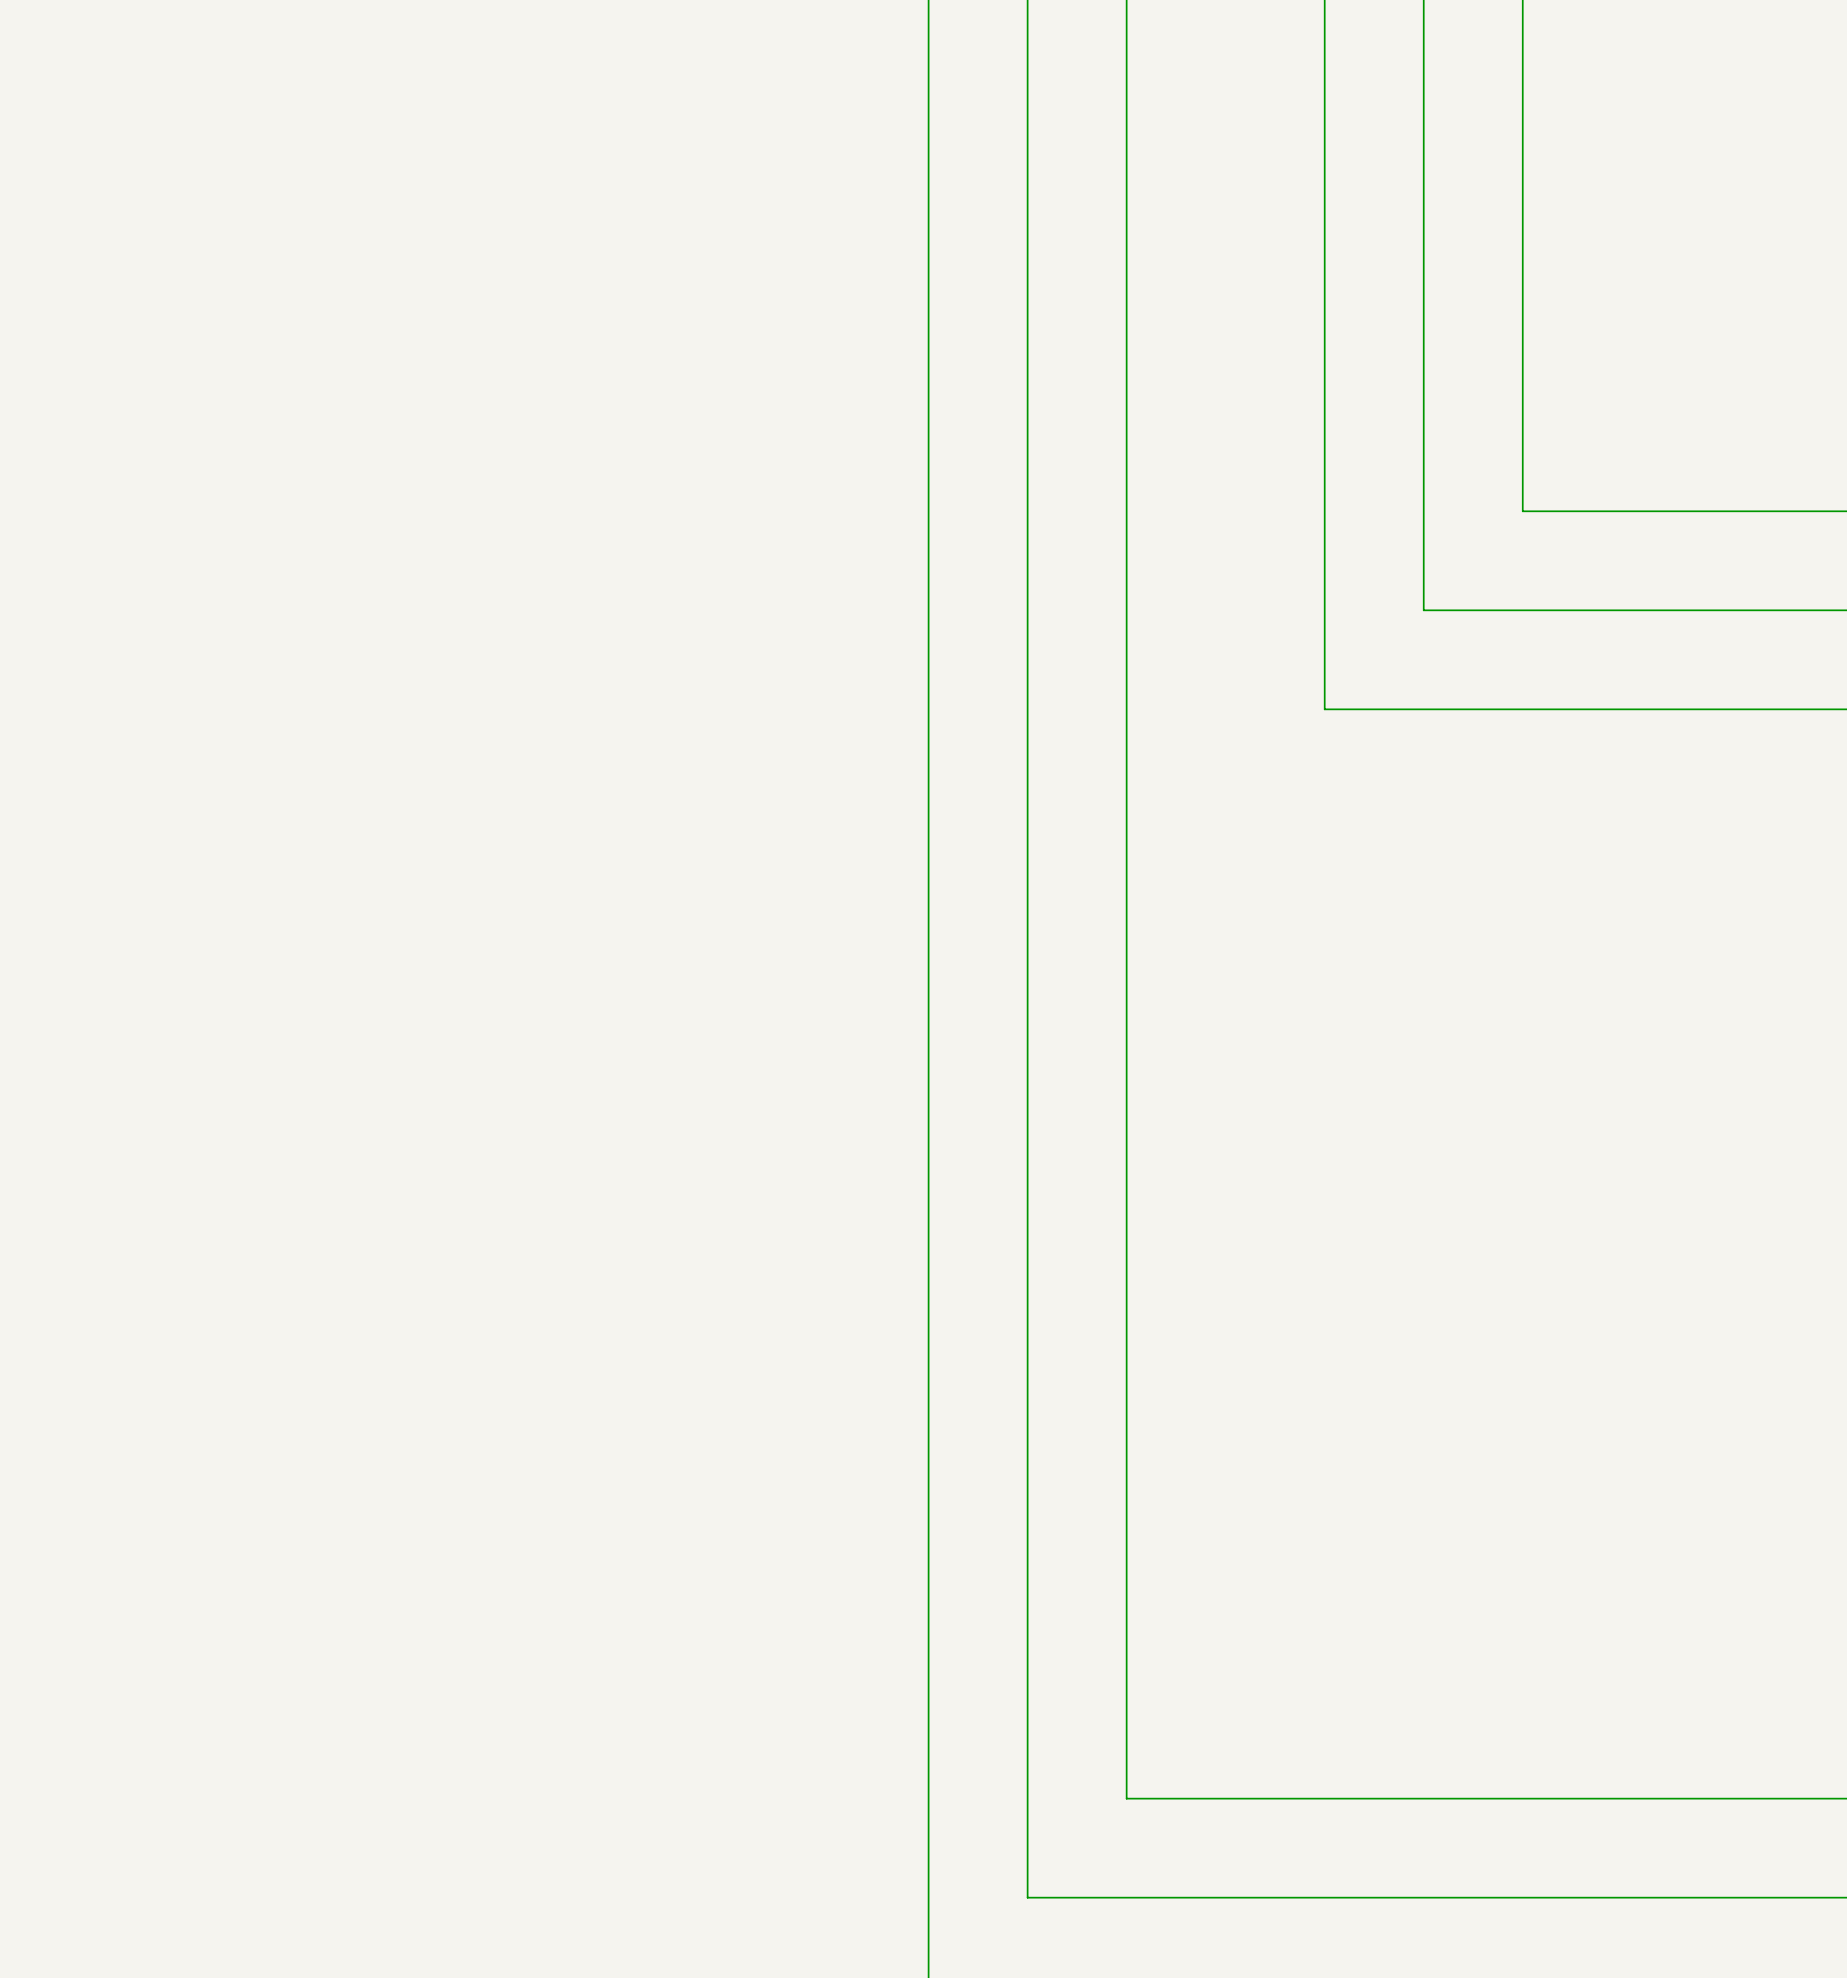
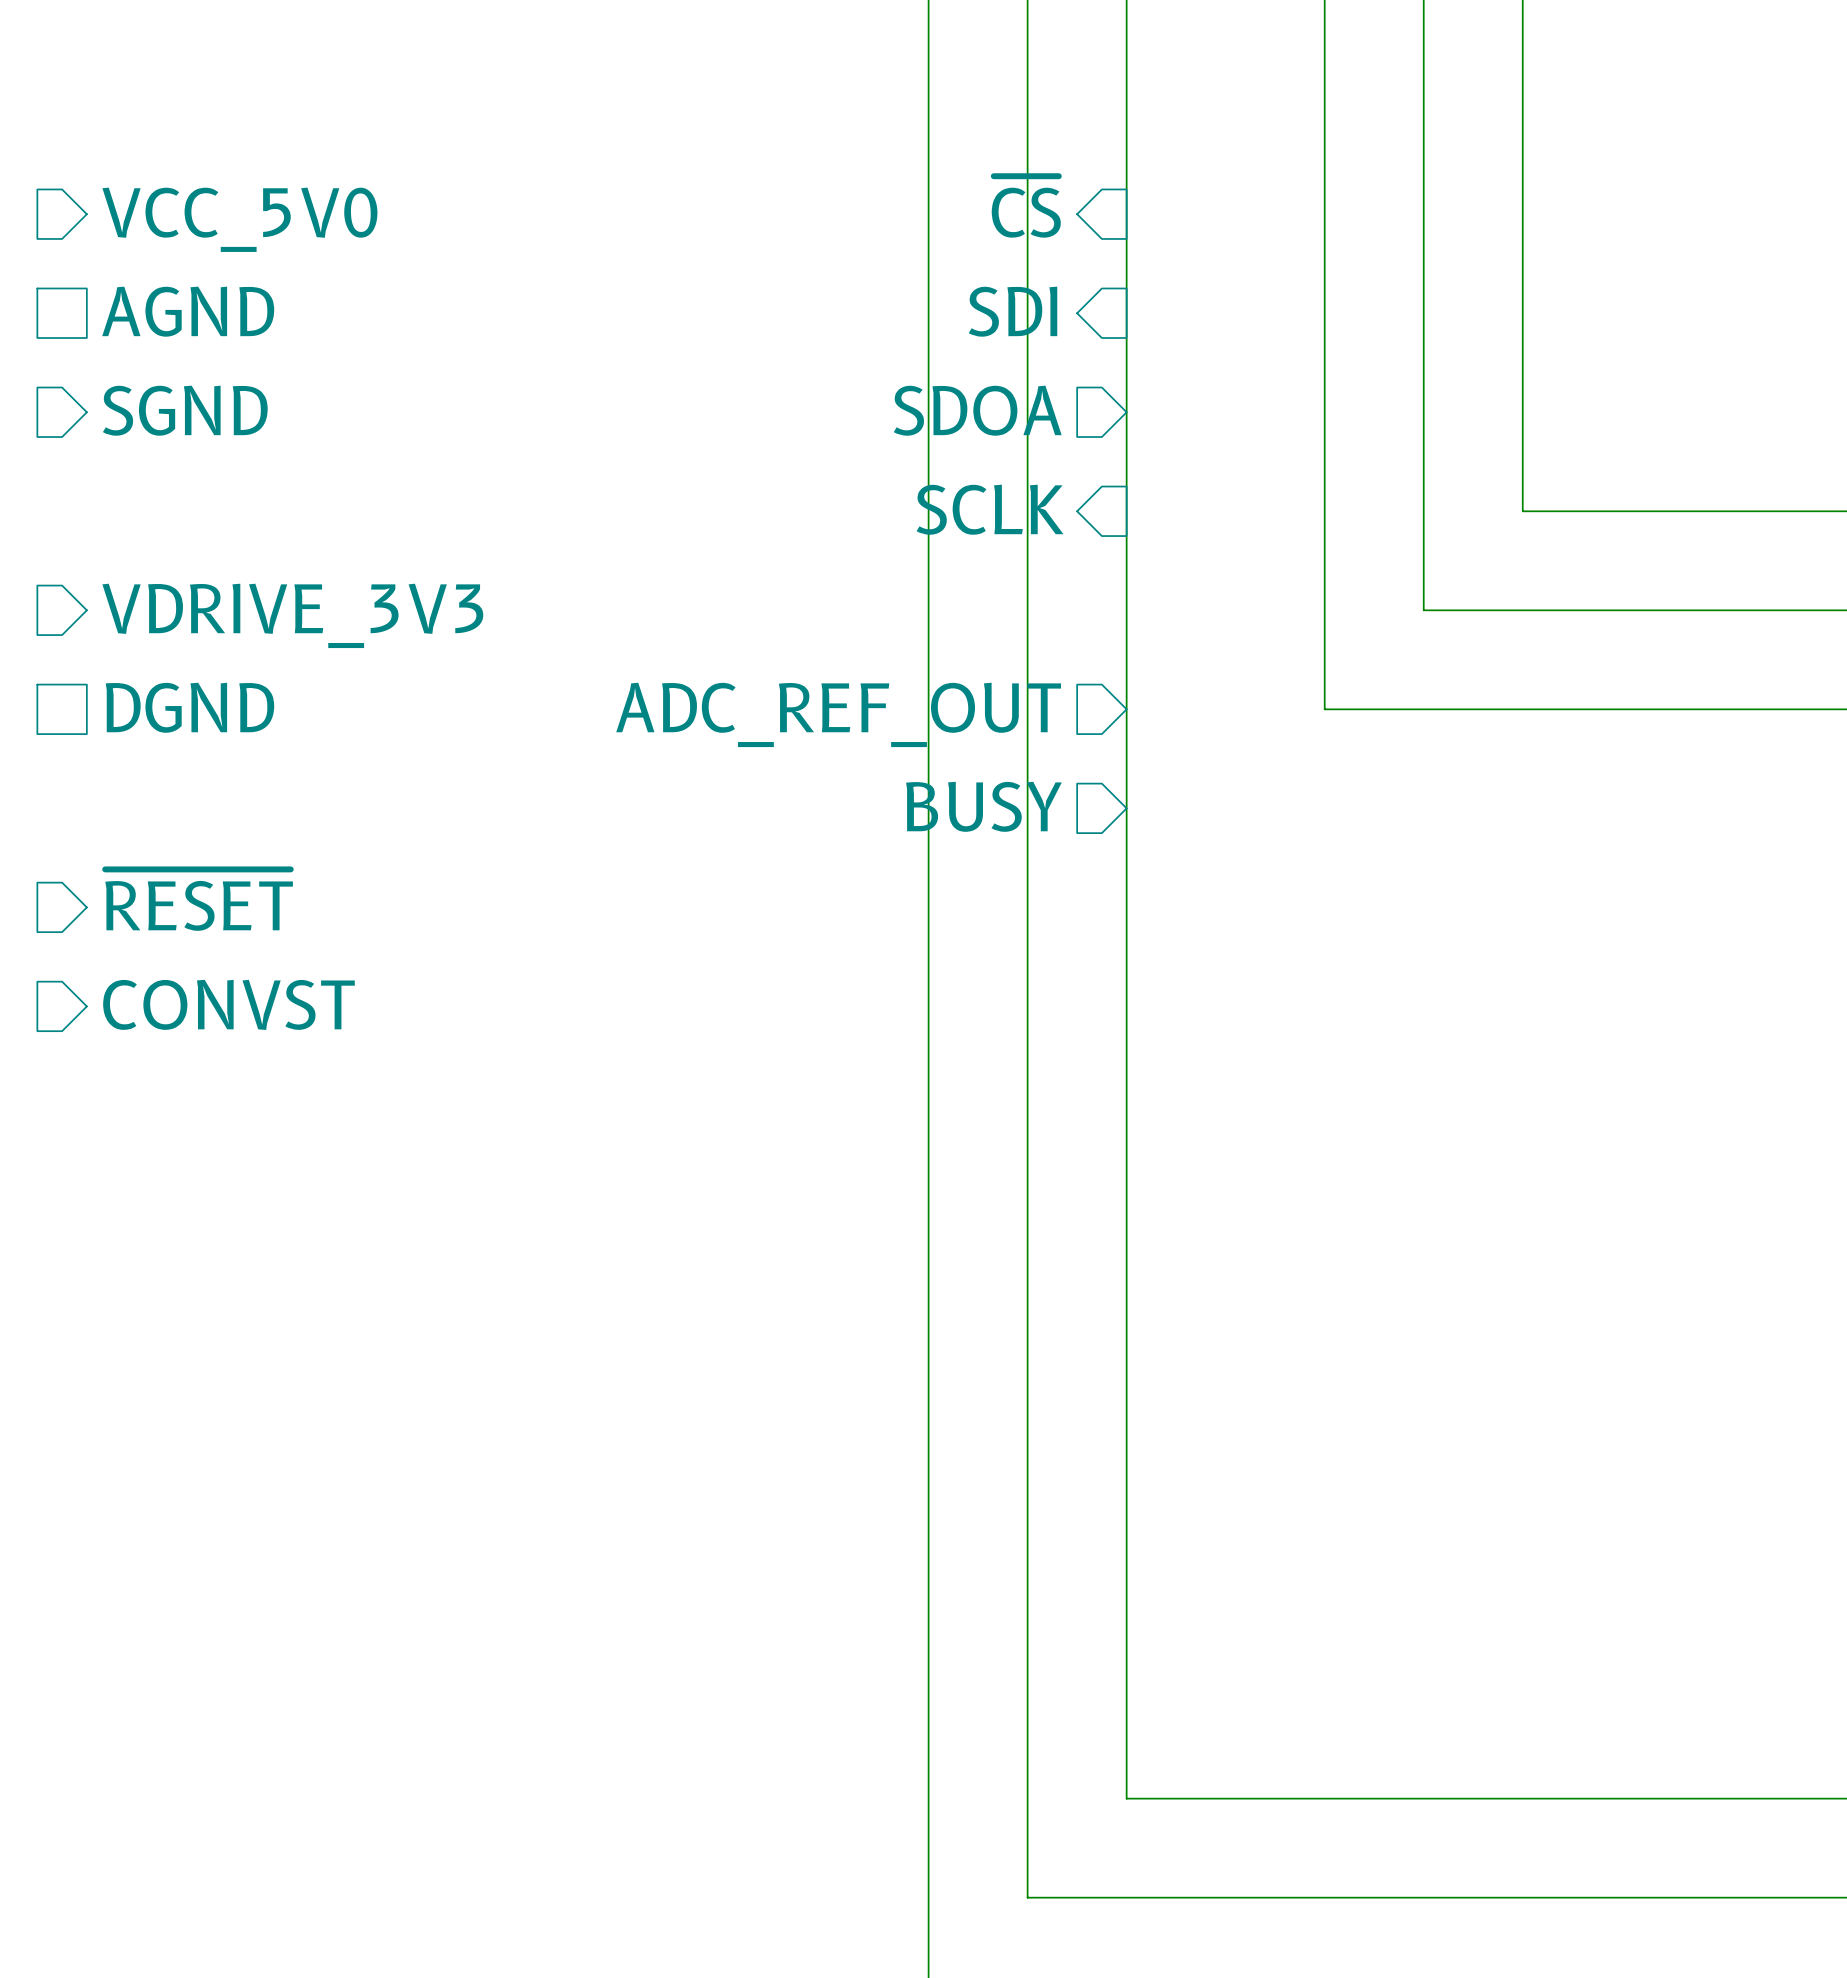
sheet pin: none -> ~{CS} (1026, 206)
sheet pin: none -> VCC_5V0 (239, 219)
sheet pin: none -> AGND (188, 311)
sheet pin: none -> SDI (1012, 311)
sheet pin: none -> SGND (185, 410)
sheet pin: none -> SDOA (977, 410)
sheet pin: none -> SCLK (990, 509)
sheet pin: none -> VDRIVE_3V3 (292, 615)
sheet pin: none -> DGND (189, 707)
sheet pin: none -> ADC_REF_OUT (838, 714)
sheet pin: none -> BUSY (983, 806)
sheet pin: none -> ~{RESET} (199, 900)
sheet pin: none -> CONVST (228, 1004)

